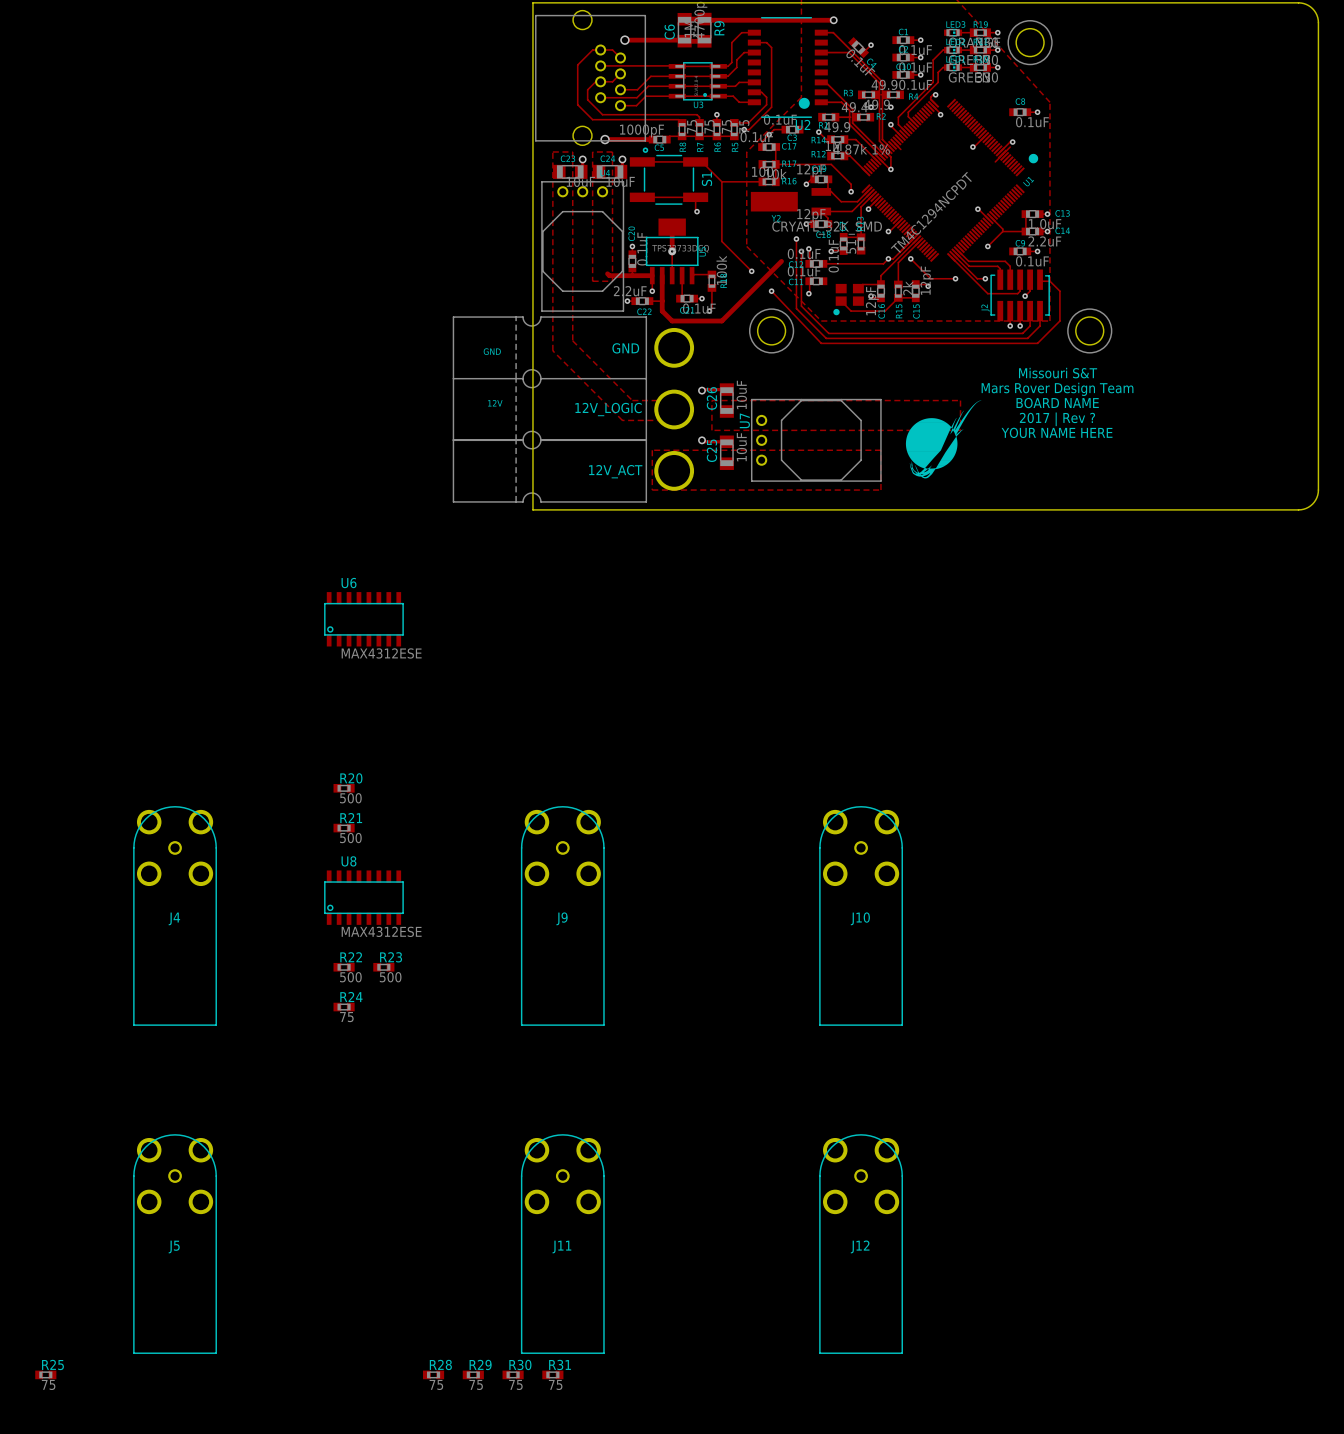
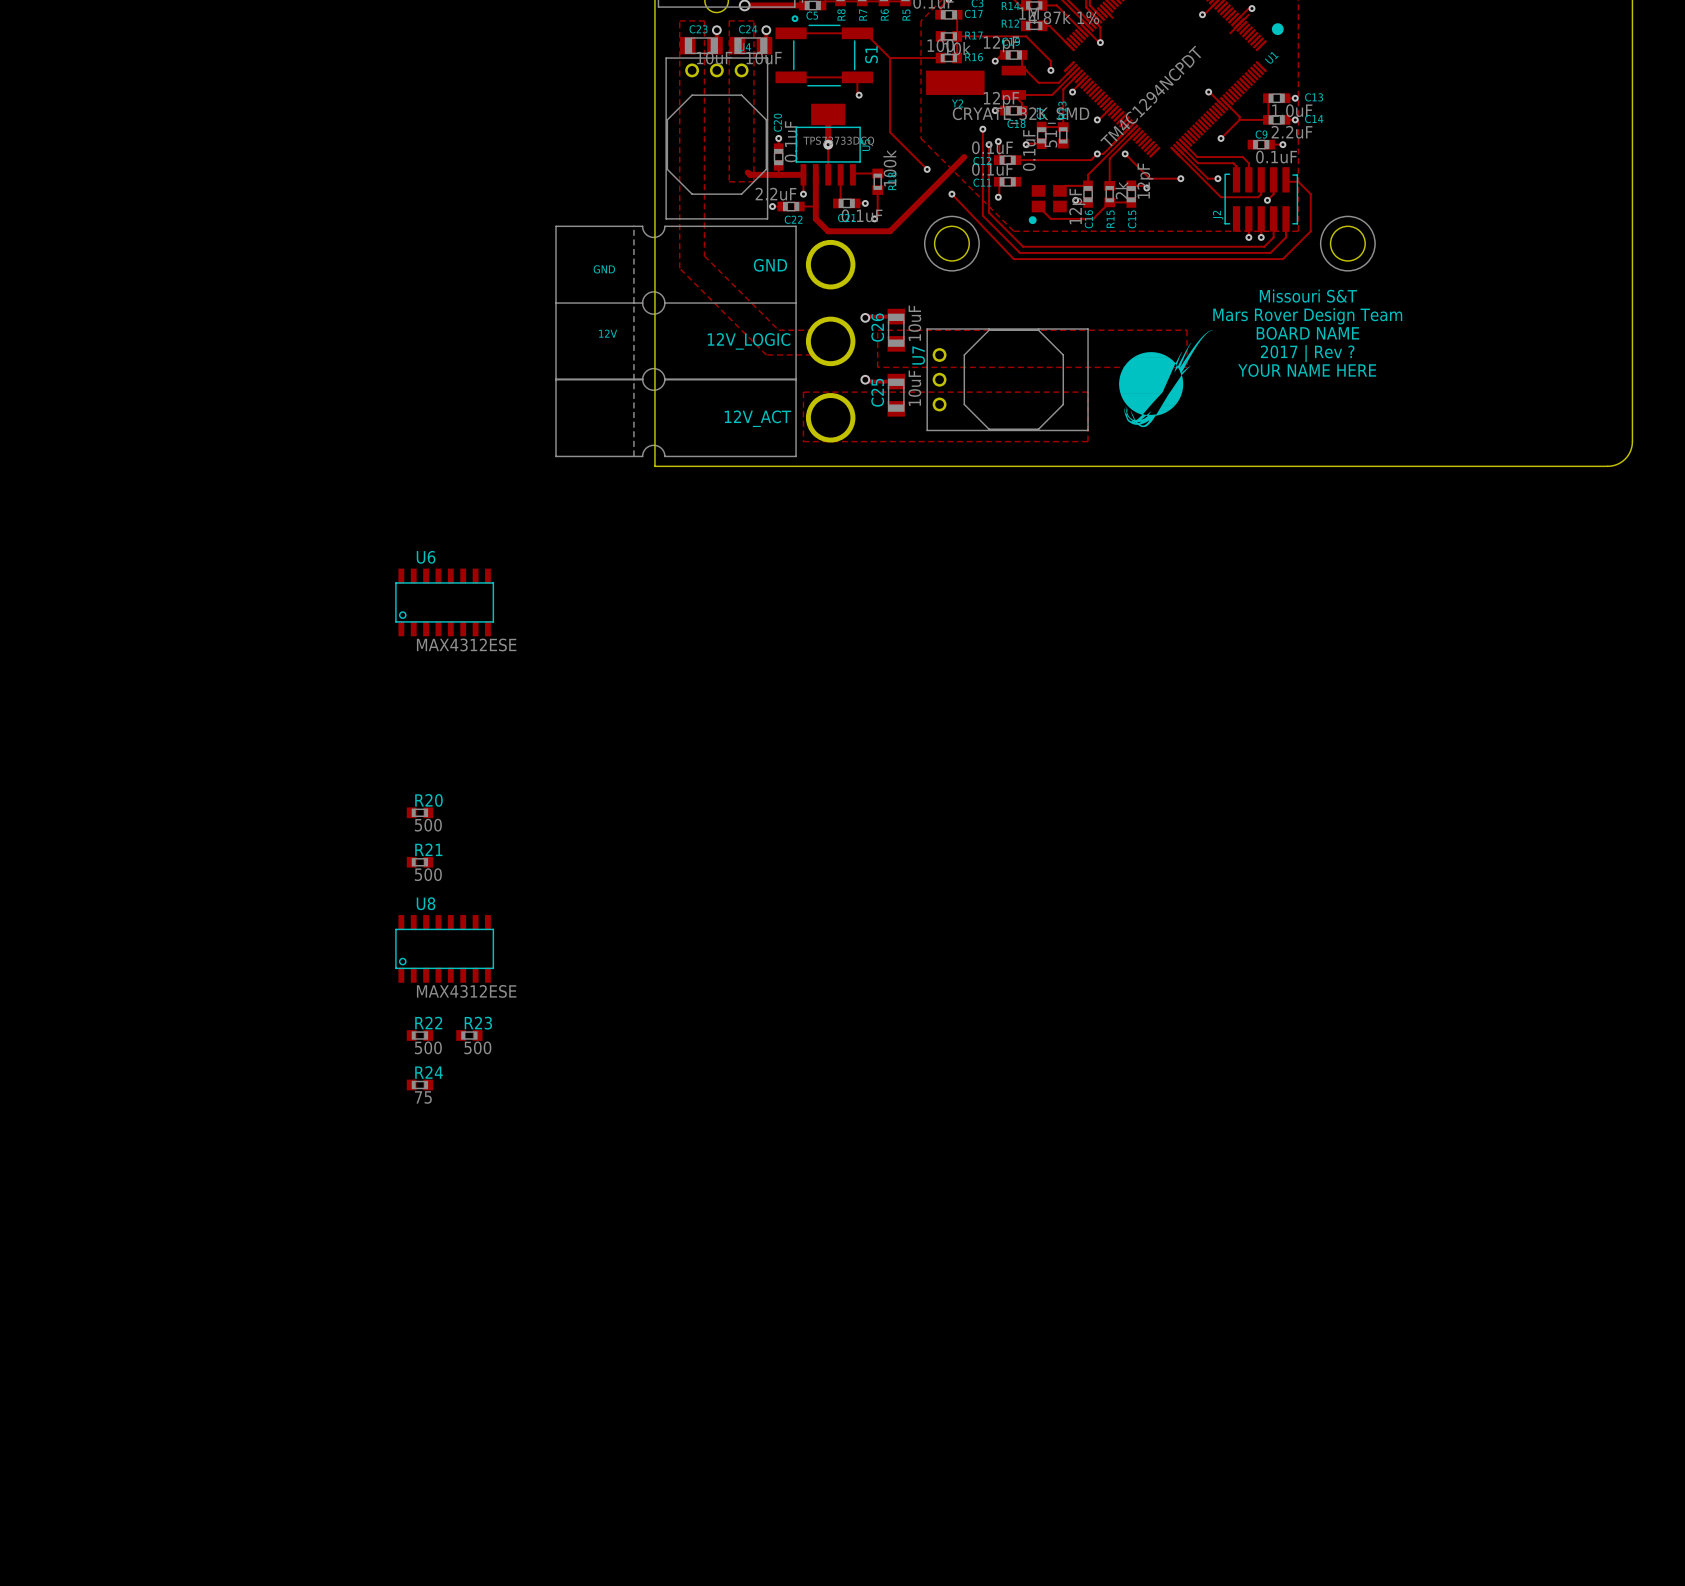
J4: (175, 915) -> none
J9: (562, 915) -> none
J10: (861, 915) -> none
J5: (175, 1244) -> none
J11: (562, 1244) -> none
J12: (861, 1244) -> none
R25: 75 (45, 1374) -> none
R28: 75 (433, 1374) -> none
R29: 75 (473, 1374) -> none
R30: 75 (513, 1374) -> none
R31: 75 (552, 1374) -> none

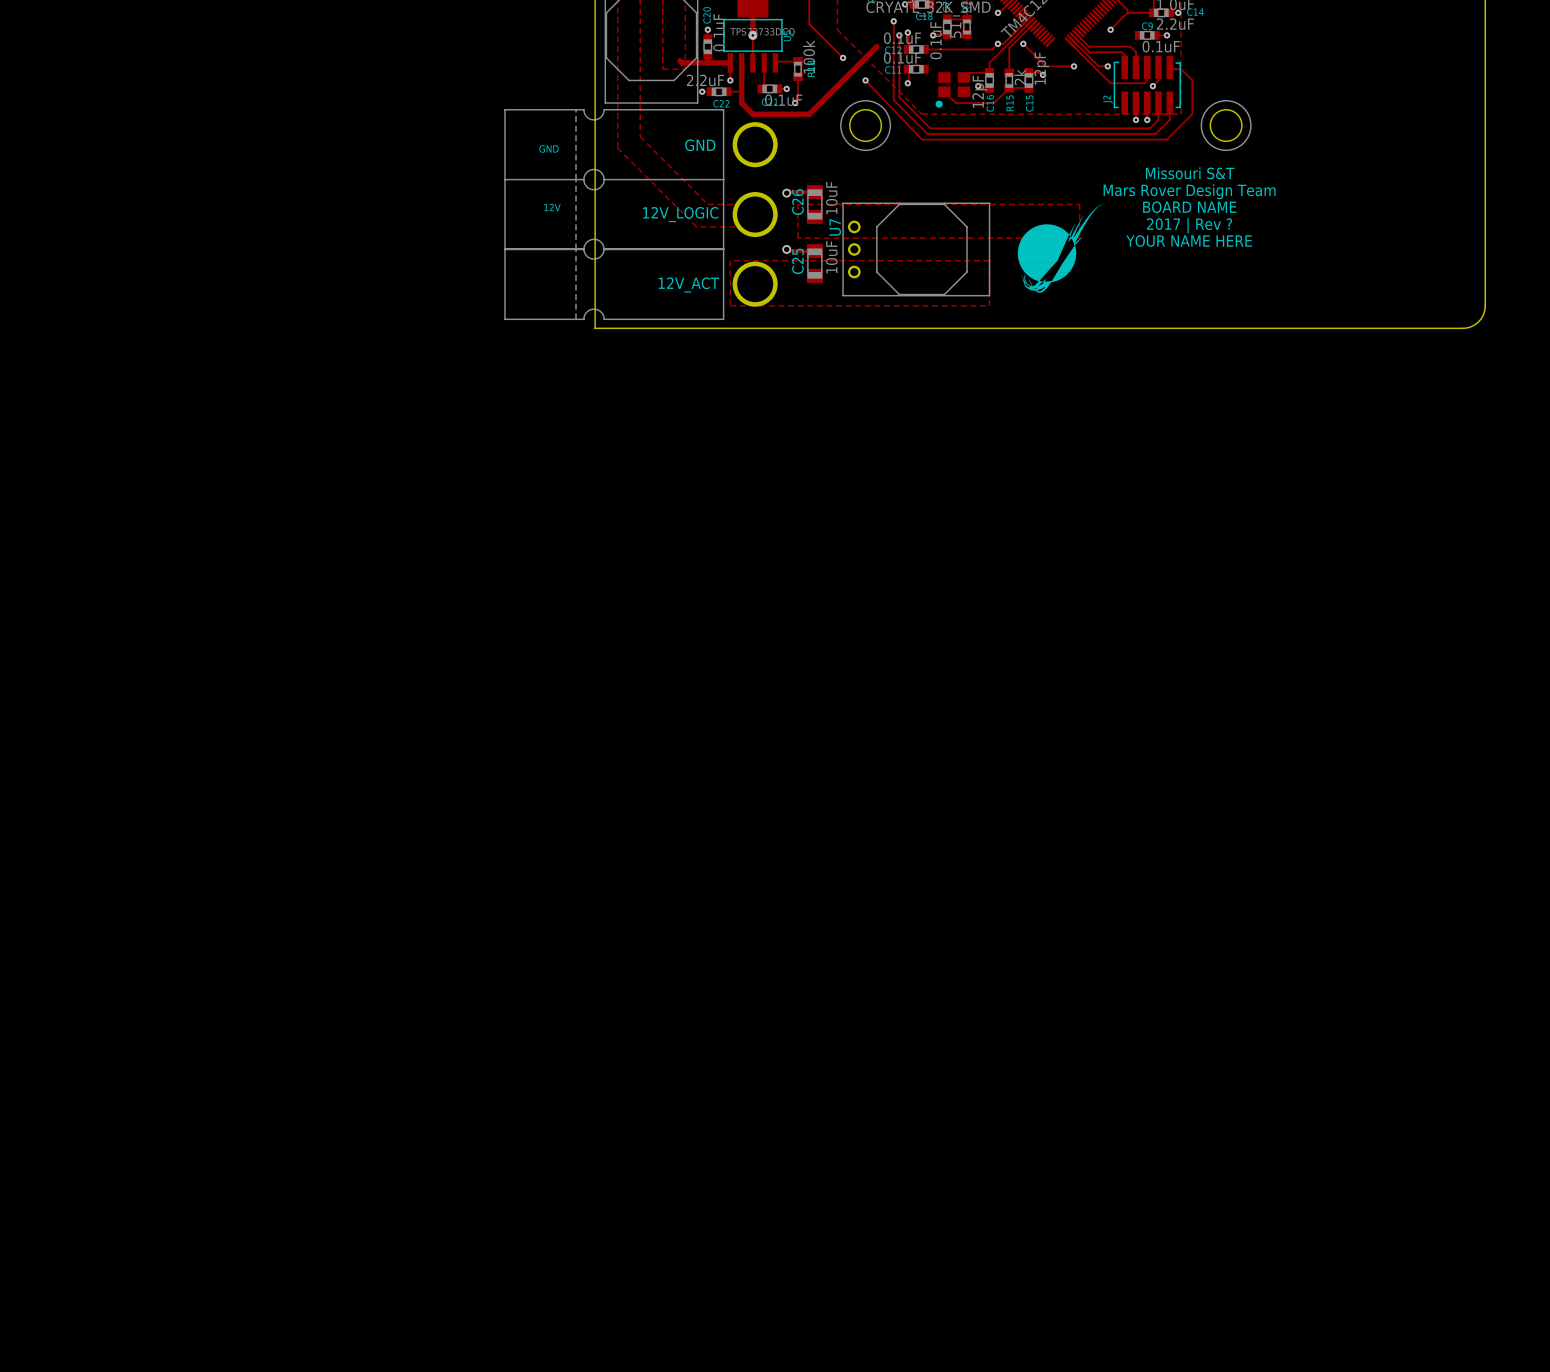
U6: MAX4312ESE (444, 602) -> none
R20: 500 (419, 812) -> none
R21: 500 (419, 862) -> none
U8: MAX4312ESE (444, 948) -> none
R22: 500 (419, 1035) -> none
R23: 500 (469, 1035) -> none
R24: 75 (419, 1084) -> none

